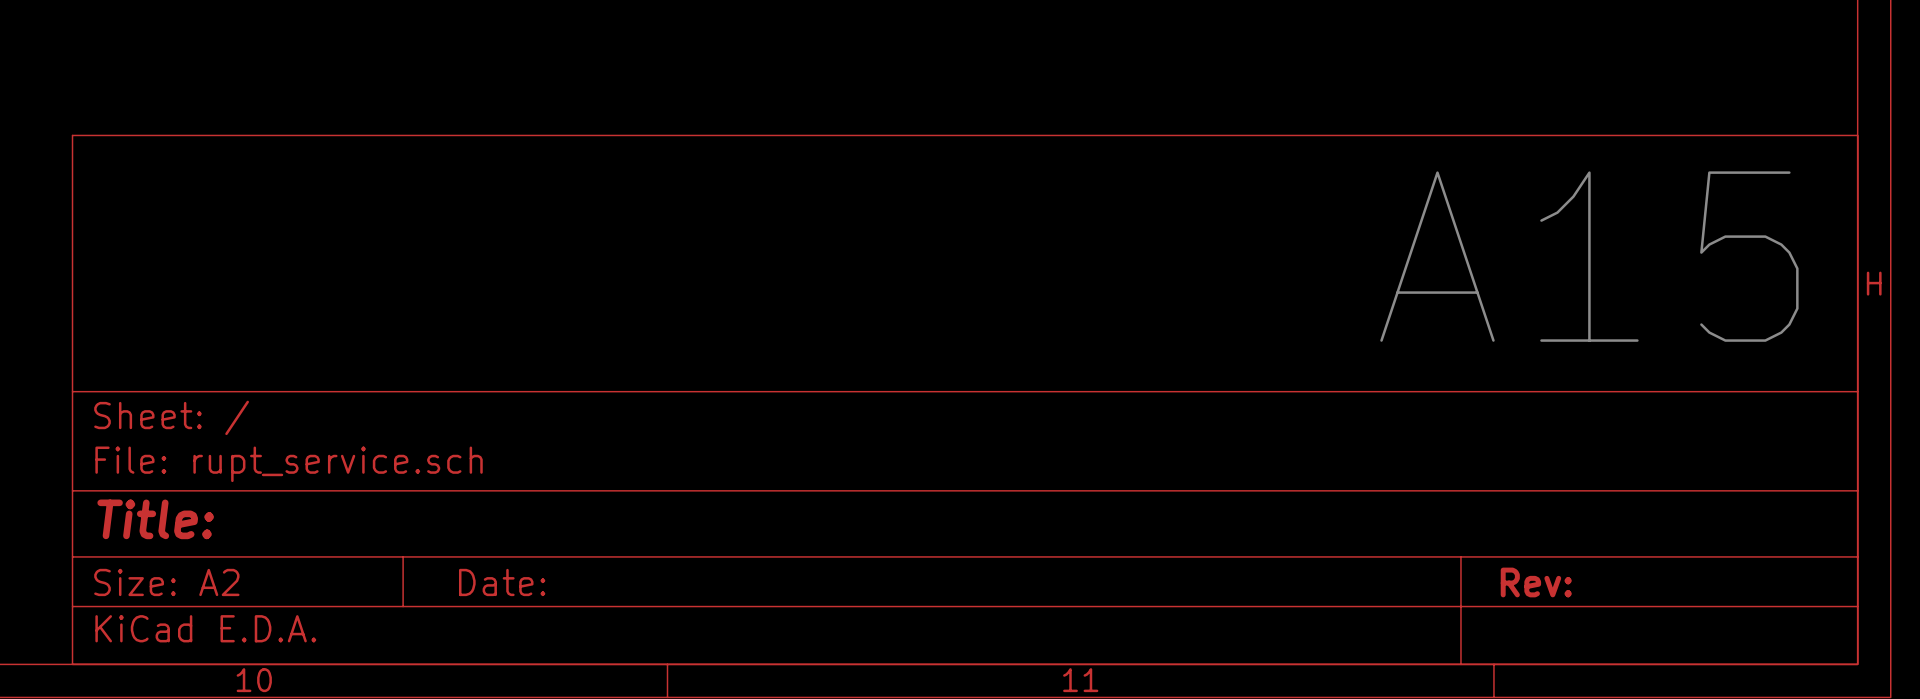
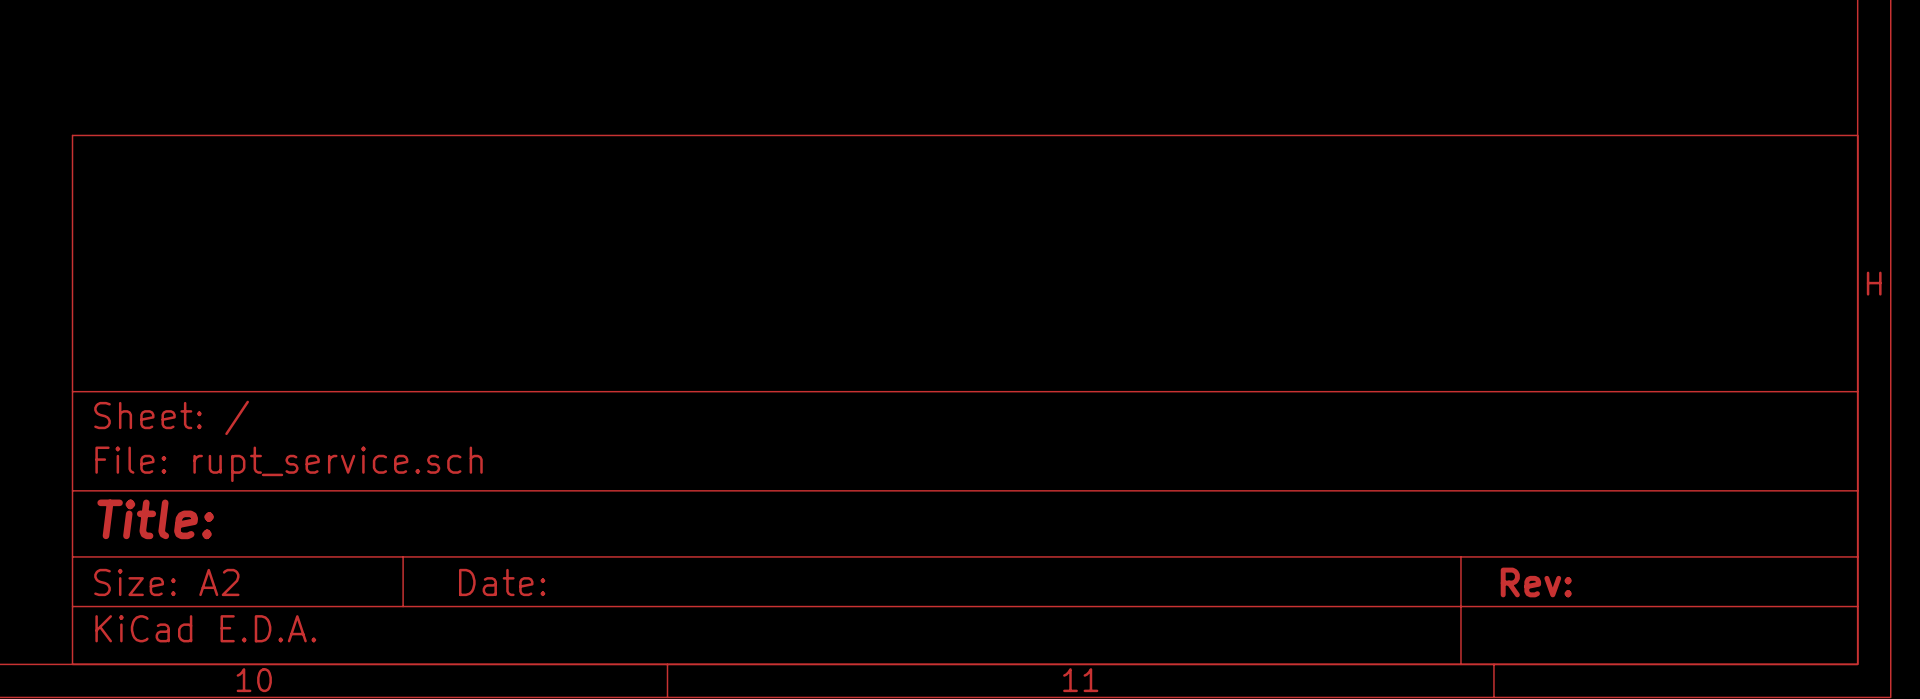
text: A15 (1589, 256) -> none

